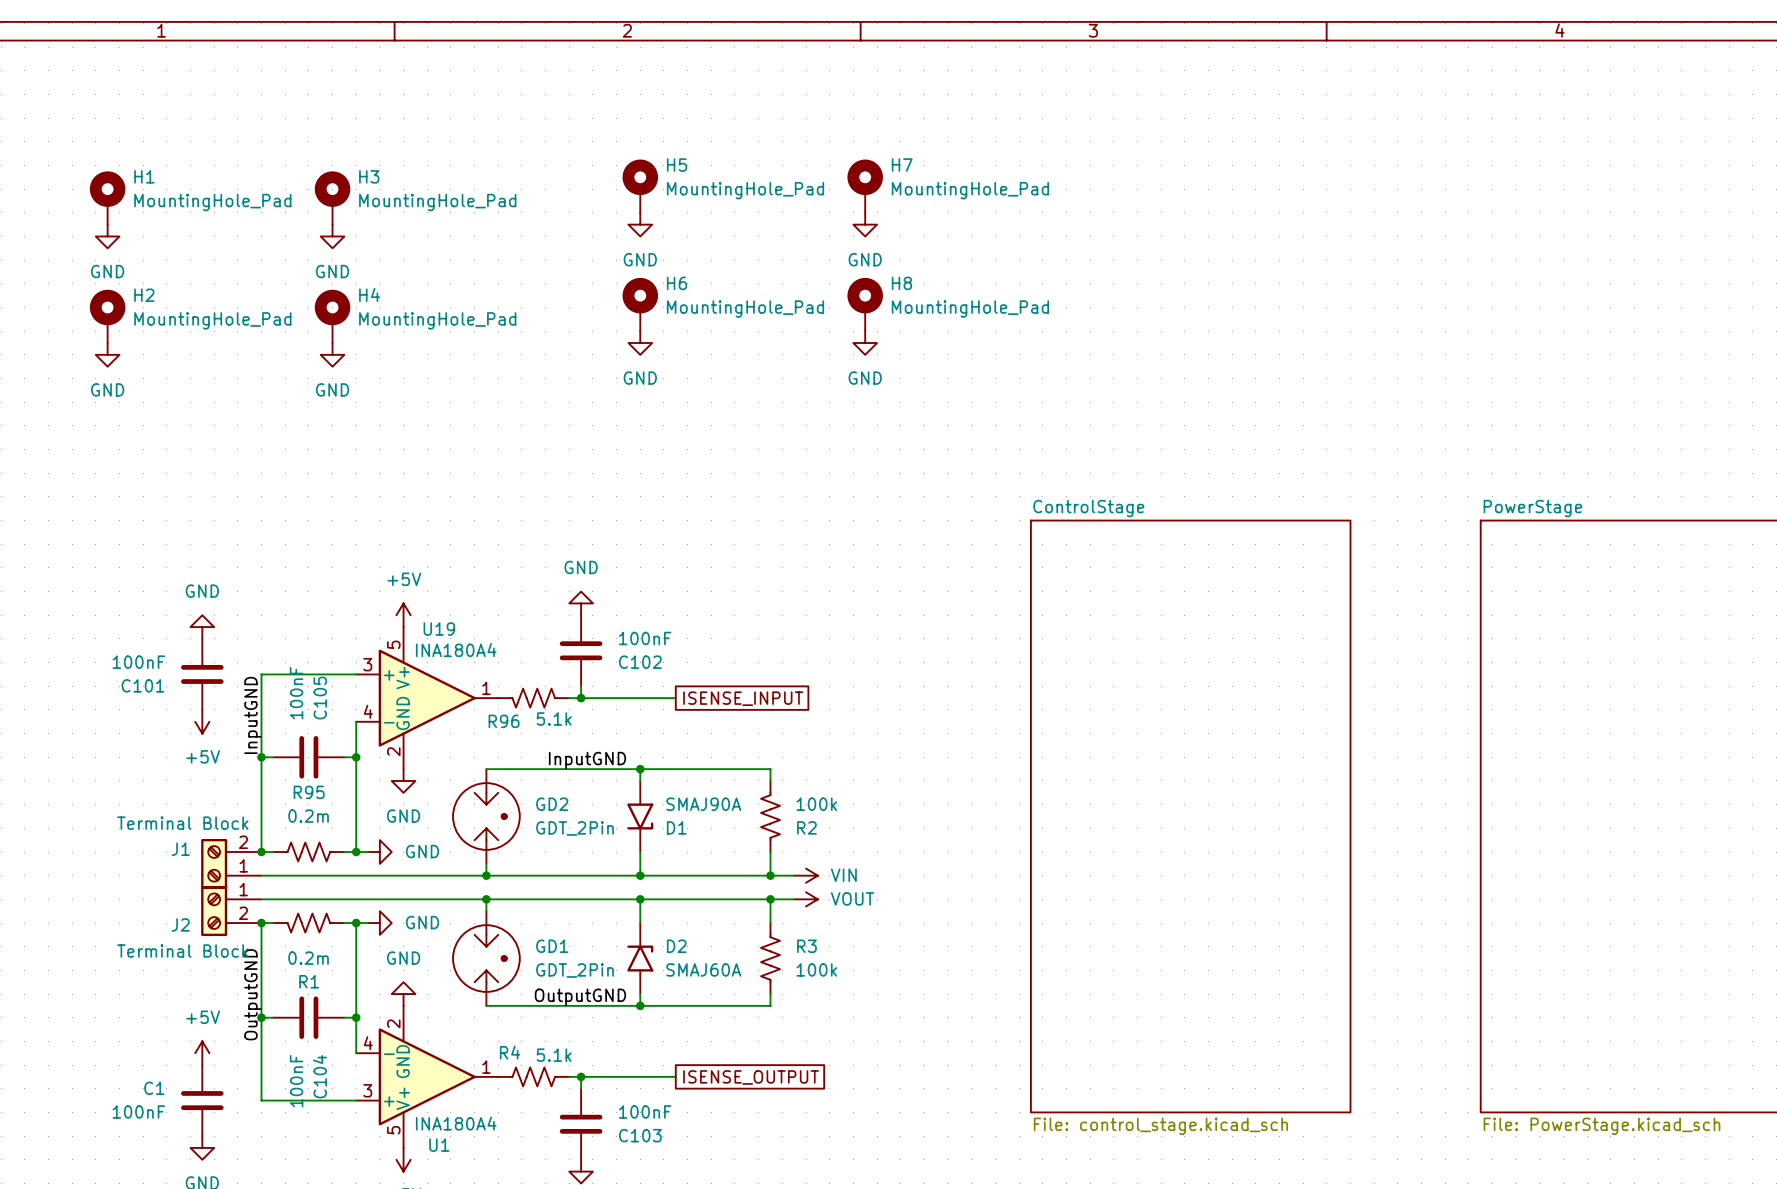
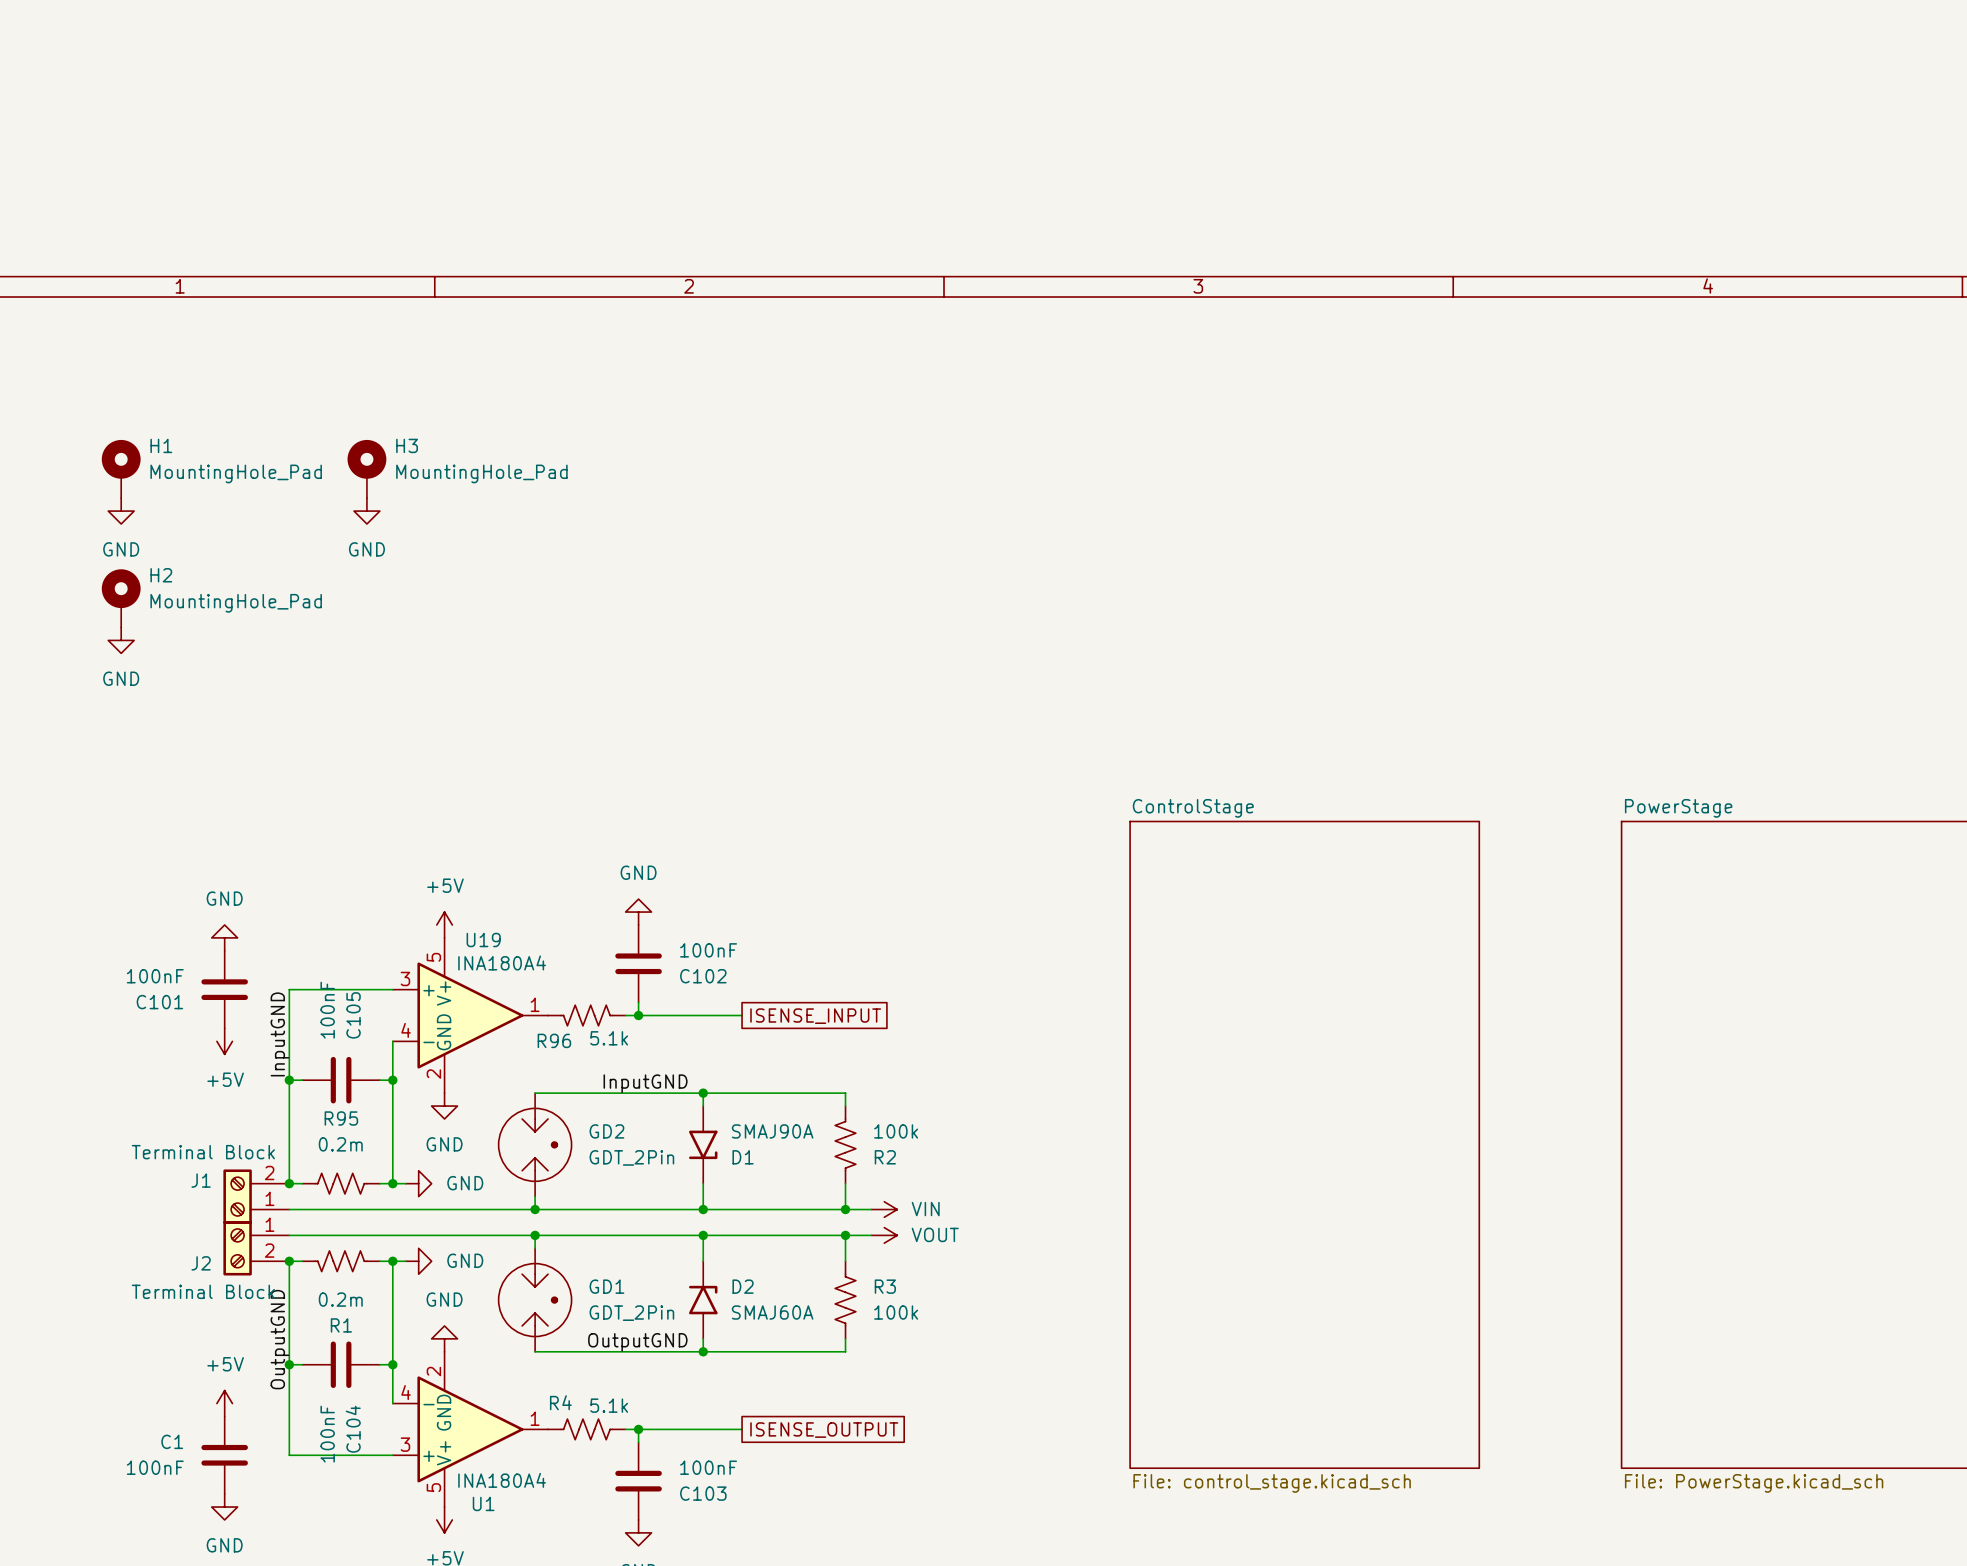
H5: MountingHole_Pad (640, 186) -> none
H7: MountingHole_Pad (865, 186) -> none
power symbol: GND (640, 224) -> none
power symbol: GND (865, 224) -> none
H6: MountingHole_Pad (640, 304) -> none
H8: MountingHole_Pad (865, 304) -> none
H4: MountingHole_Pad (332, 316) -> none
power symbol: GND (640, 343) -> none
power symbol: GND (865, 343) -> none
power symbol: GND (332, 354) -> none

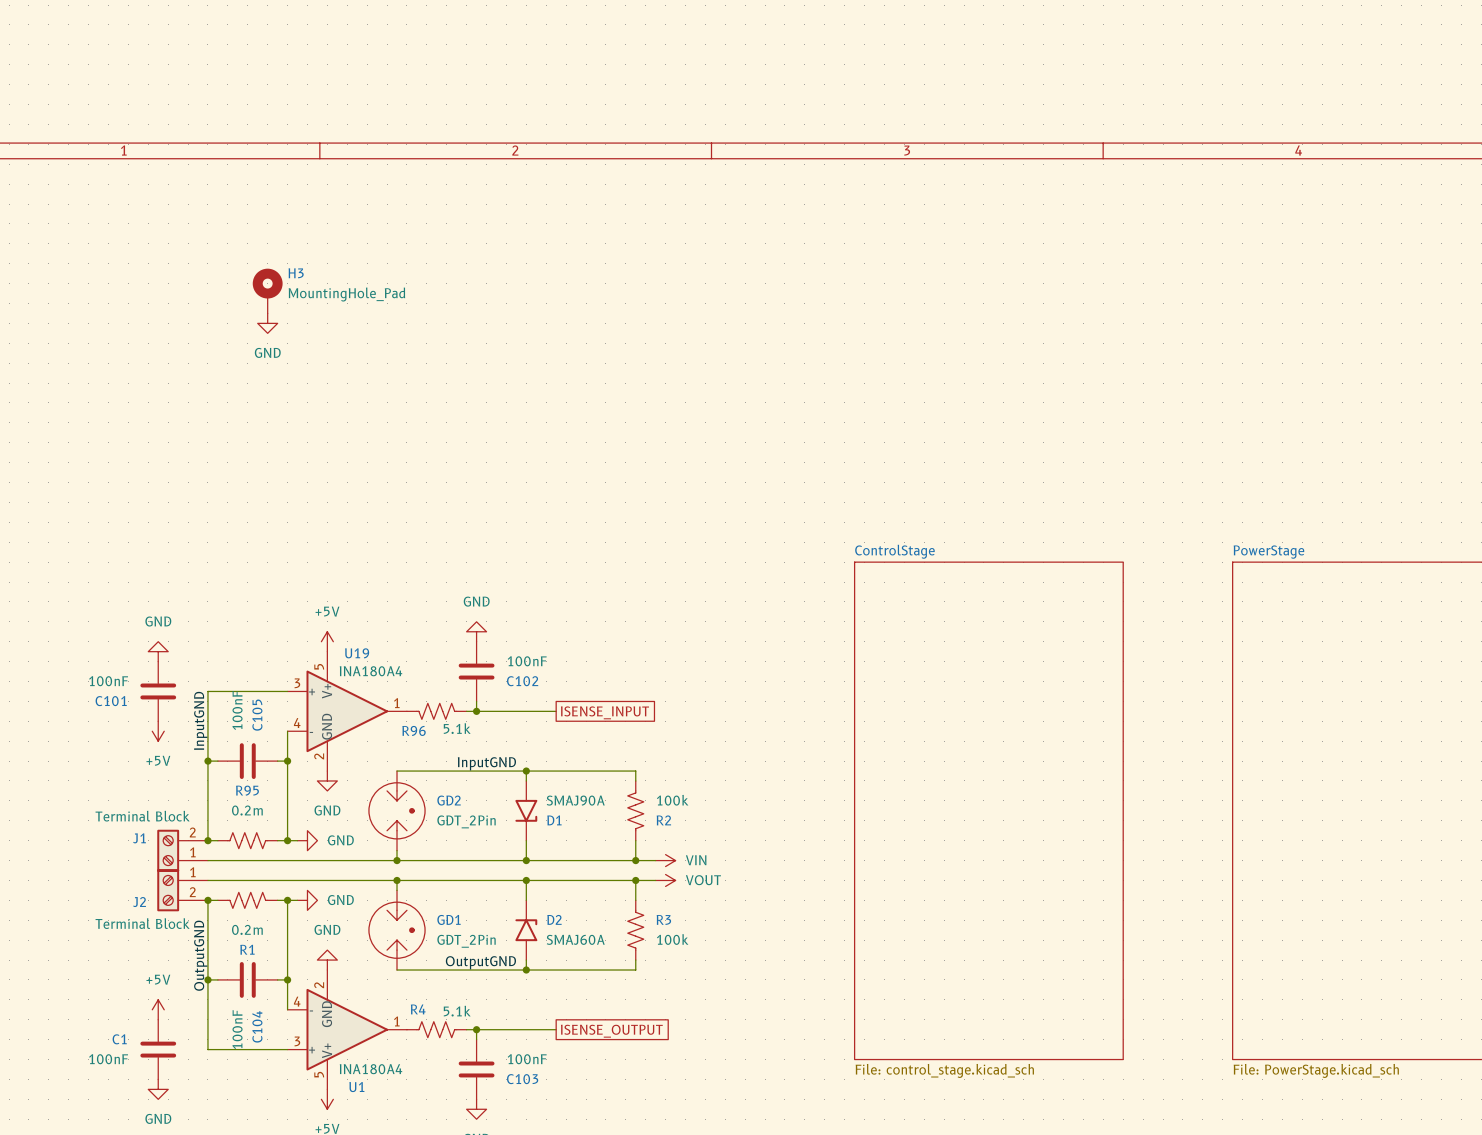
H1: MountingHole_Pad (121, 469) -> none
power symbol: GND (121, 511) -> none
H2: MountingHole_Pad (121, 598) -> none
power symbol: GND (121, 640) -> none

